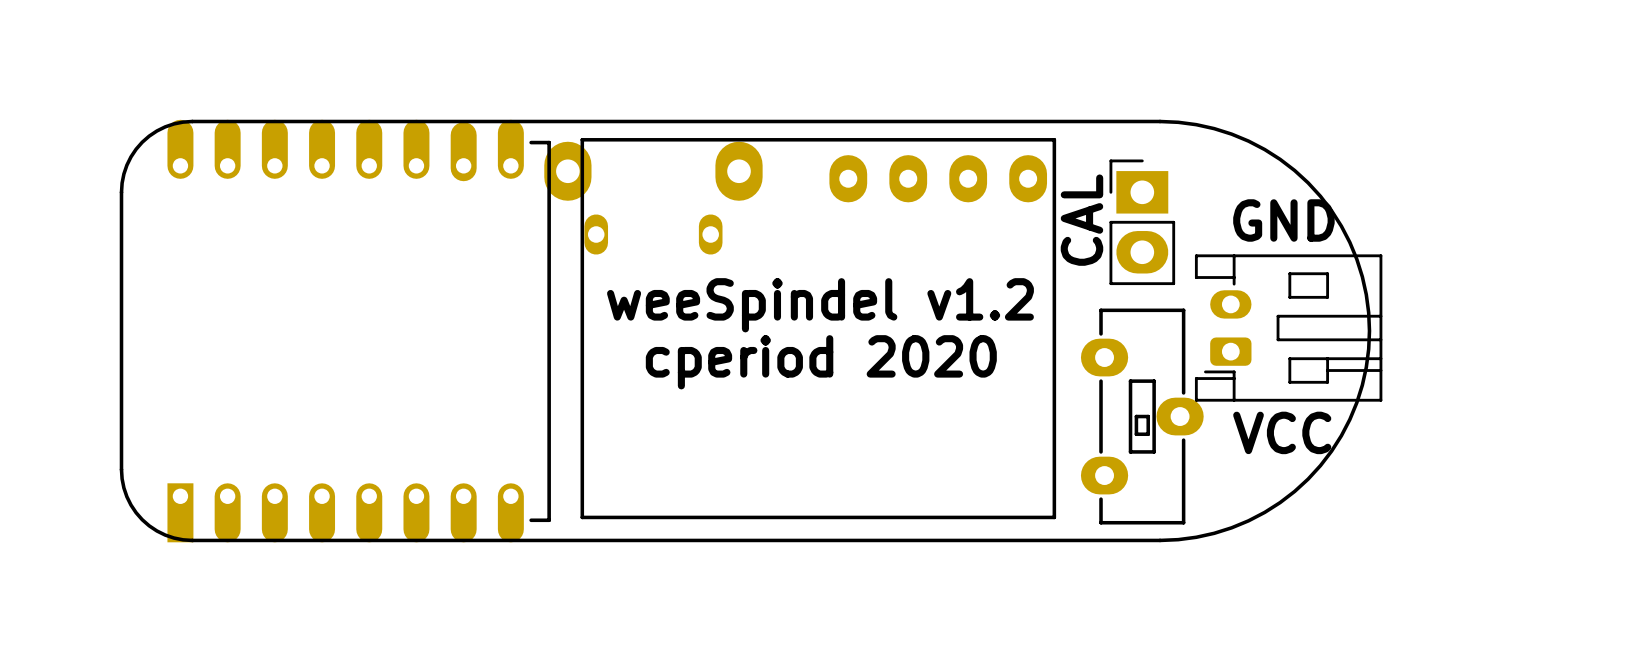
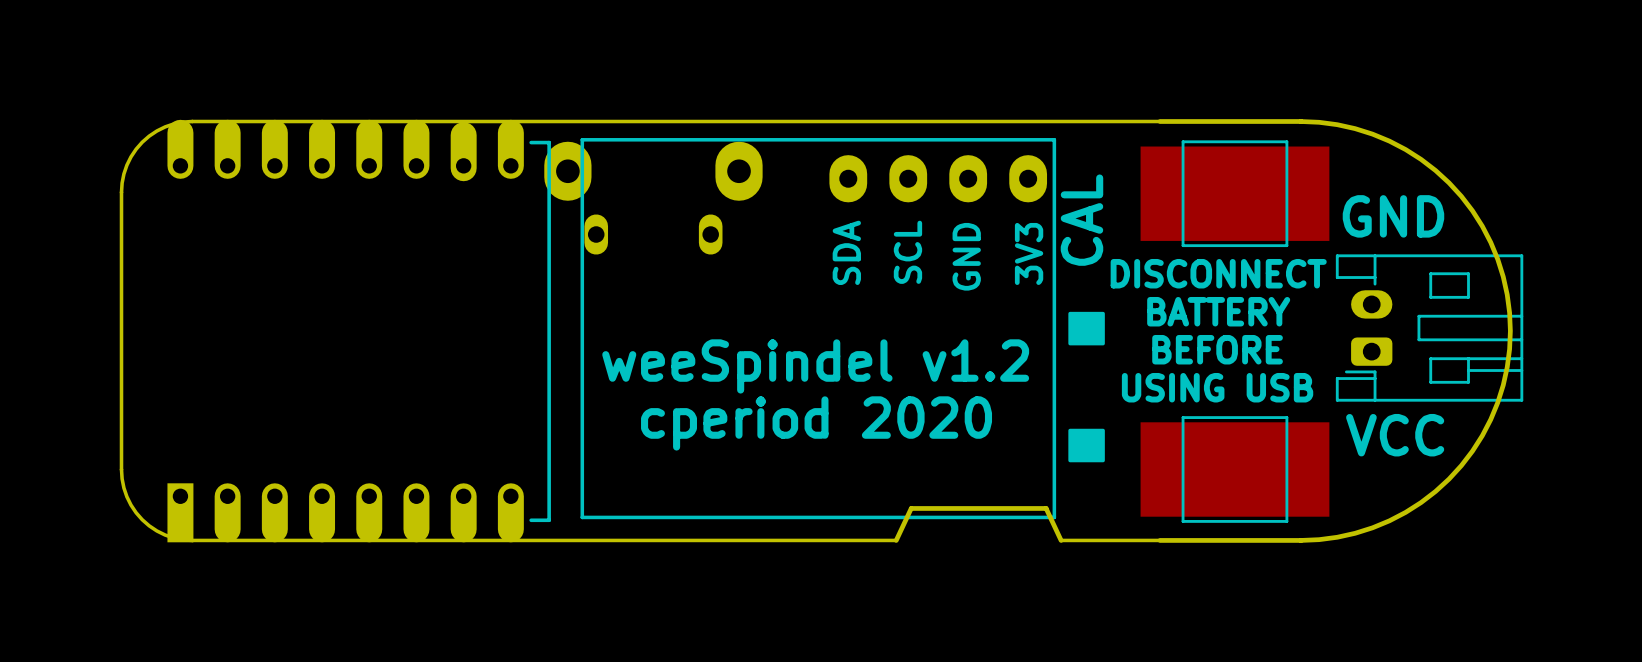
board edge: (1160, 121) (1196, 124) (1231, 134) (1264, 149) (1280, 159) (1308, 182) (1331, 210) (1349, 242) (1362, 276) (1368, 312) (1369, 330) (1368, 349) (1362, 385) (1349, 419) (1331, 451) (1308, 479) (1280, 502) (1264, 512) (1231, 527) (1196, 537) (1160, 540) -> (1160, 121) (1319, 122) (1355, 128) (1389, 141) (1405, 149) (1421, 159) (1449, 182) (1472, 210) (1482, 226) (1490, 242) (1503, 276) (1509, 312) (1510, 330) (1509, 349) (1503, 385) (1490, 419) (1482, 435) (1472, 451) (1449, 479) (1435, 491) (1405, 512) (1389, 520) (1355, 533) (1319, 539) (1160, 540)
part: none -> (1234, 193)
text position: GND (1283, 220) -> GND (1393, 216)
part: (1142, 222) -> none
text: none -> SDA (846, 252)
text: none -> SCL (907, 252)
text: none -> 3V3 (1029, 253)
text: none -> GND (966, 256)
text: none -> DISCONNECT (1218, 273)
text position: weeSpindel v1.2 (820, 305) -> weeSpindel v1.2 (815, 366)
drawing: none -> [1068, 311, 1105, 346]
text: none -> BATTERY (1218, 311)
part position: (1288, 328) -> (1429, 328)
text: none -> BEFORE (1217, 349)
text position: cperiod 2020 (821, 362) -> cperiod 2020 (816, 423)
text: none -> USING USB (1217, 387)
part: (1142, 416) -> none
drawing: none -> [1068, 428, 1105, 463]
text position: VCC (1282, 432) -> VCC (1395, 435)
part: none -> (1234, 469)
board edge: (896, 540) (1061, 540) -> (896, 540) (911, 508) (1046, 508) (1061, 540)

